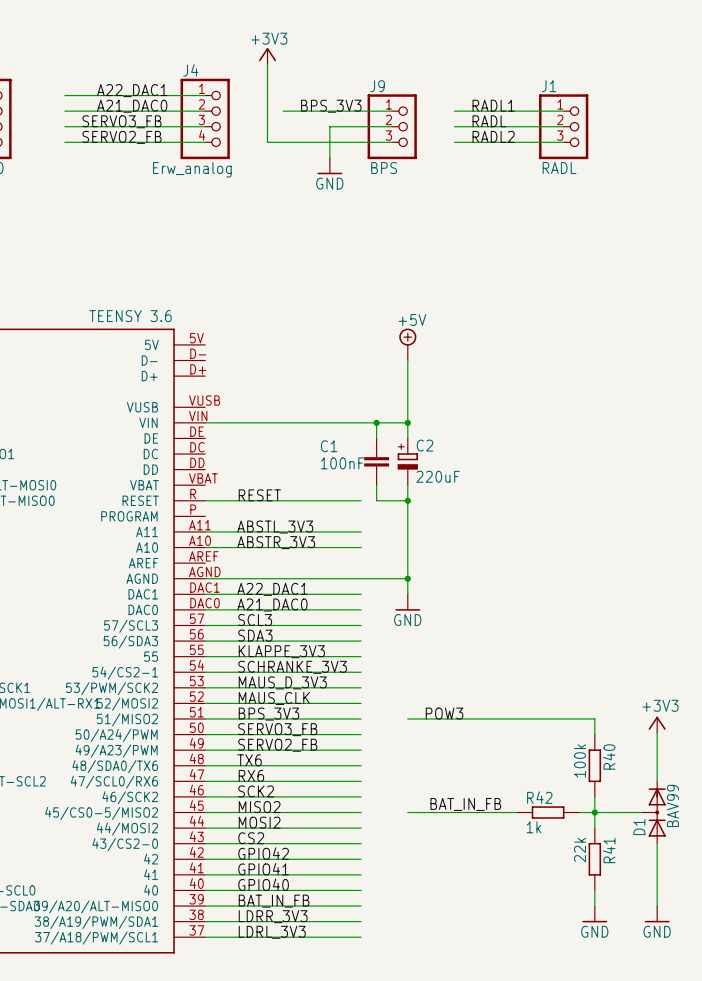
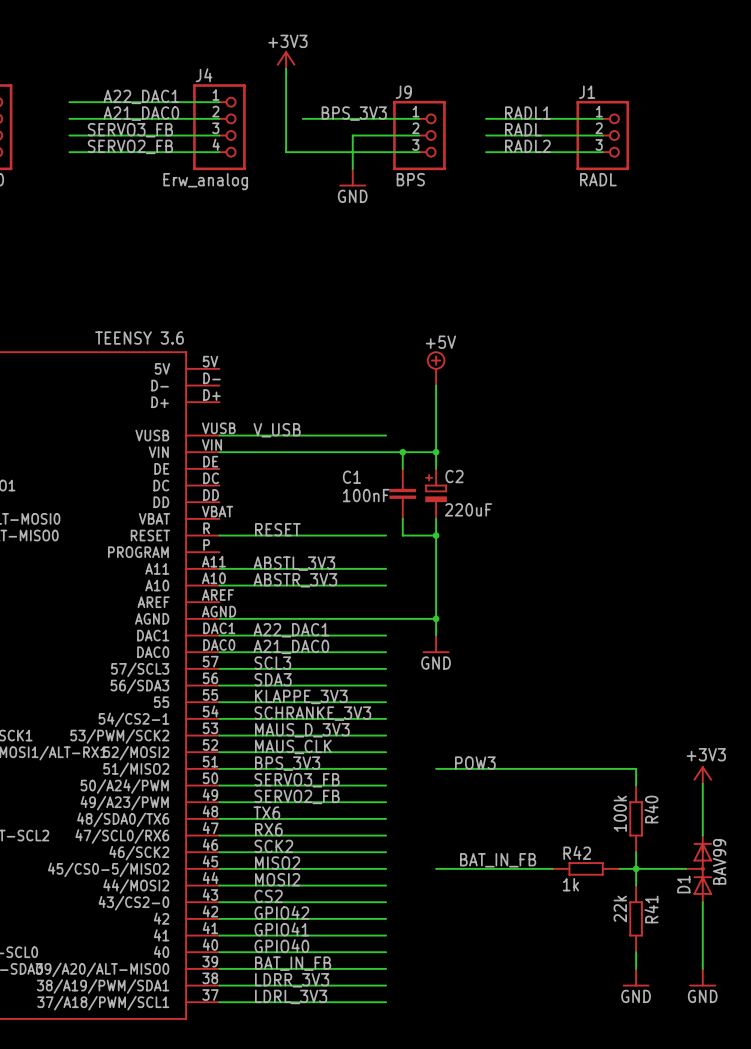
label: none -> V_USB (277, 430)
wire: none -> (219, 435) (386, 435)

